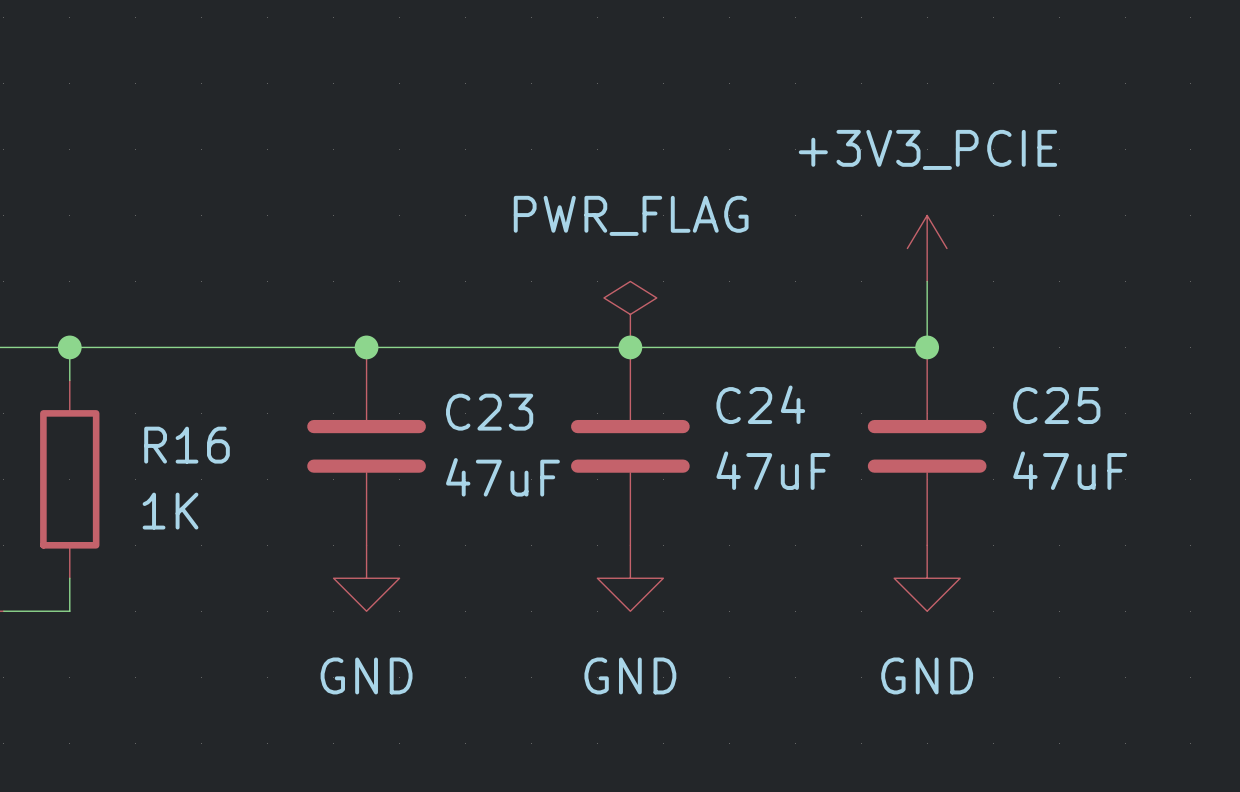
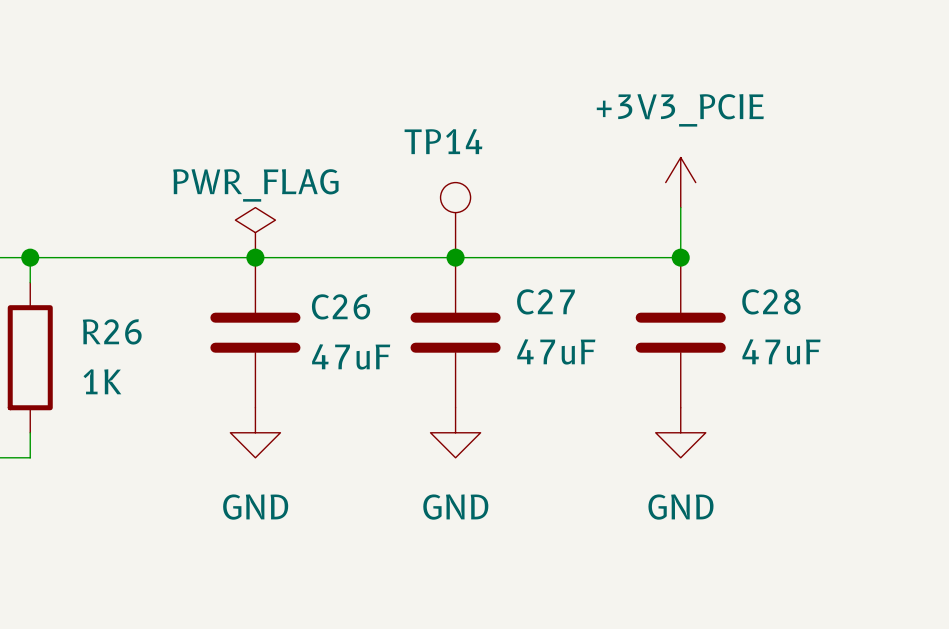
power symbol text position: PWR_FLAG (631, 215) -> PWR_FLAG (255, 185)
TP14: none -> (455, 220)
power symbol position: PWR_FLAG (630, 314) -> PWR_FLAG (255, 232)
C24 name: C24 (760, 404) -> C27 (545, 301)
C25 name: C25 (1056, 405) -> C28 (771, 301)
C23 name: C23 (489, 412) -> C26 (341, 306)
R16 name: R16 (187, 445) -> R26 (112, 331)

